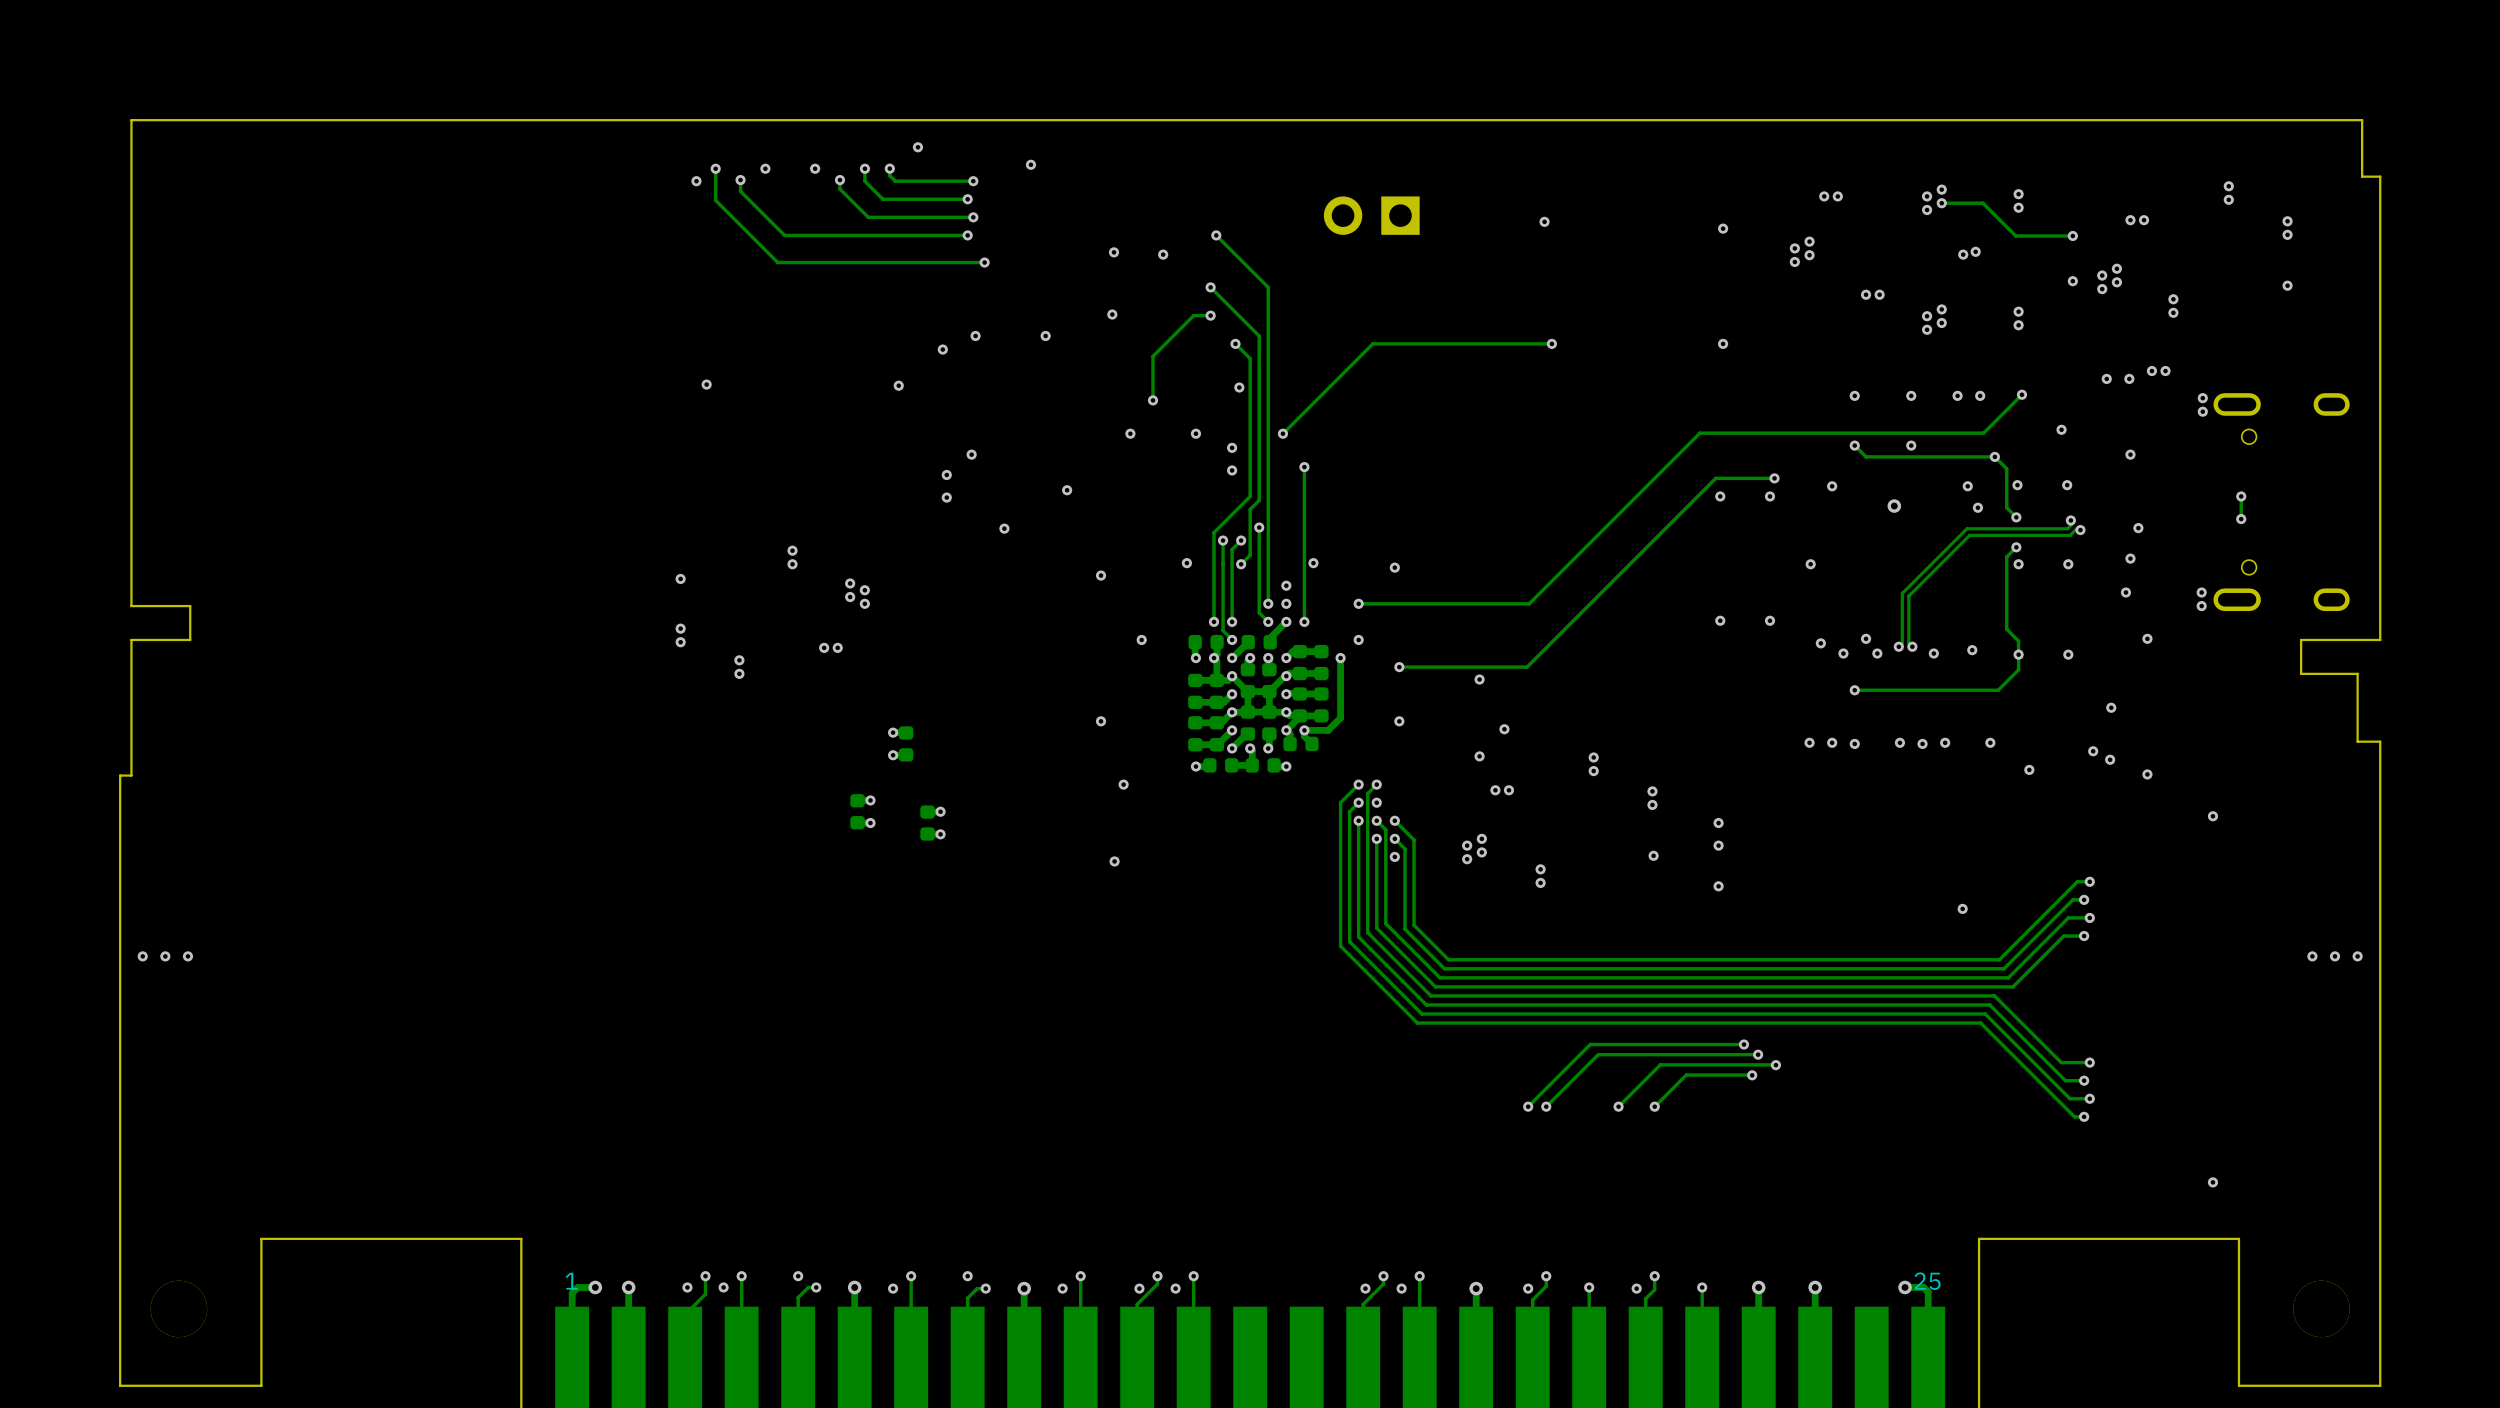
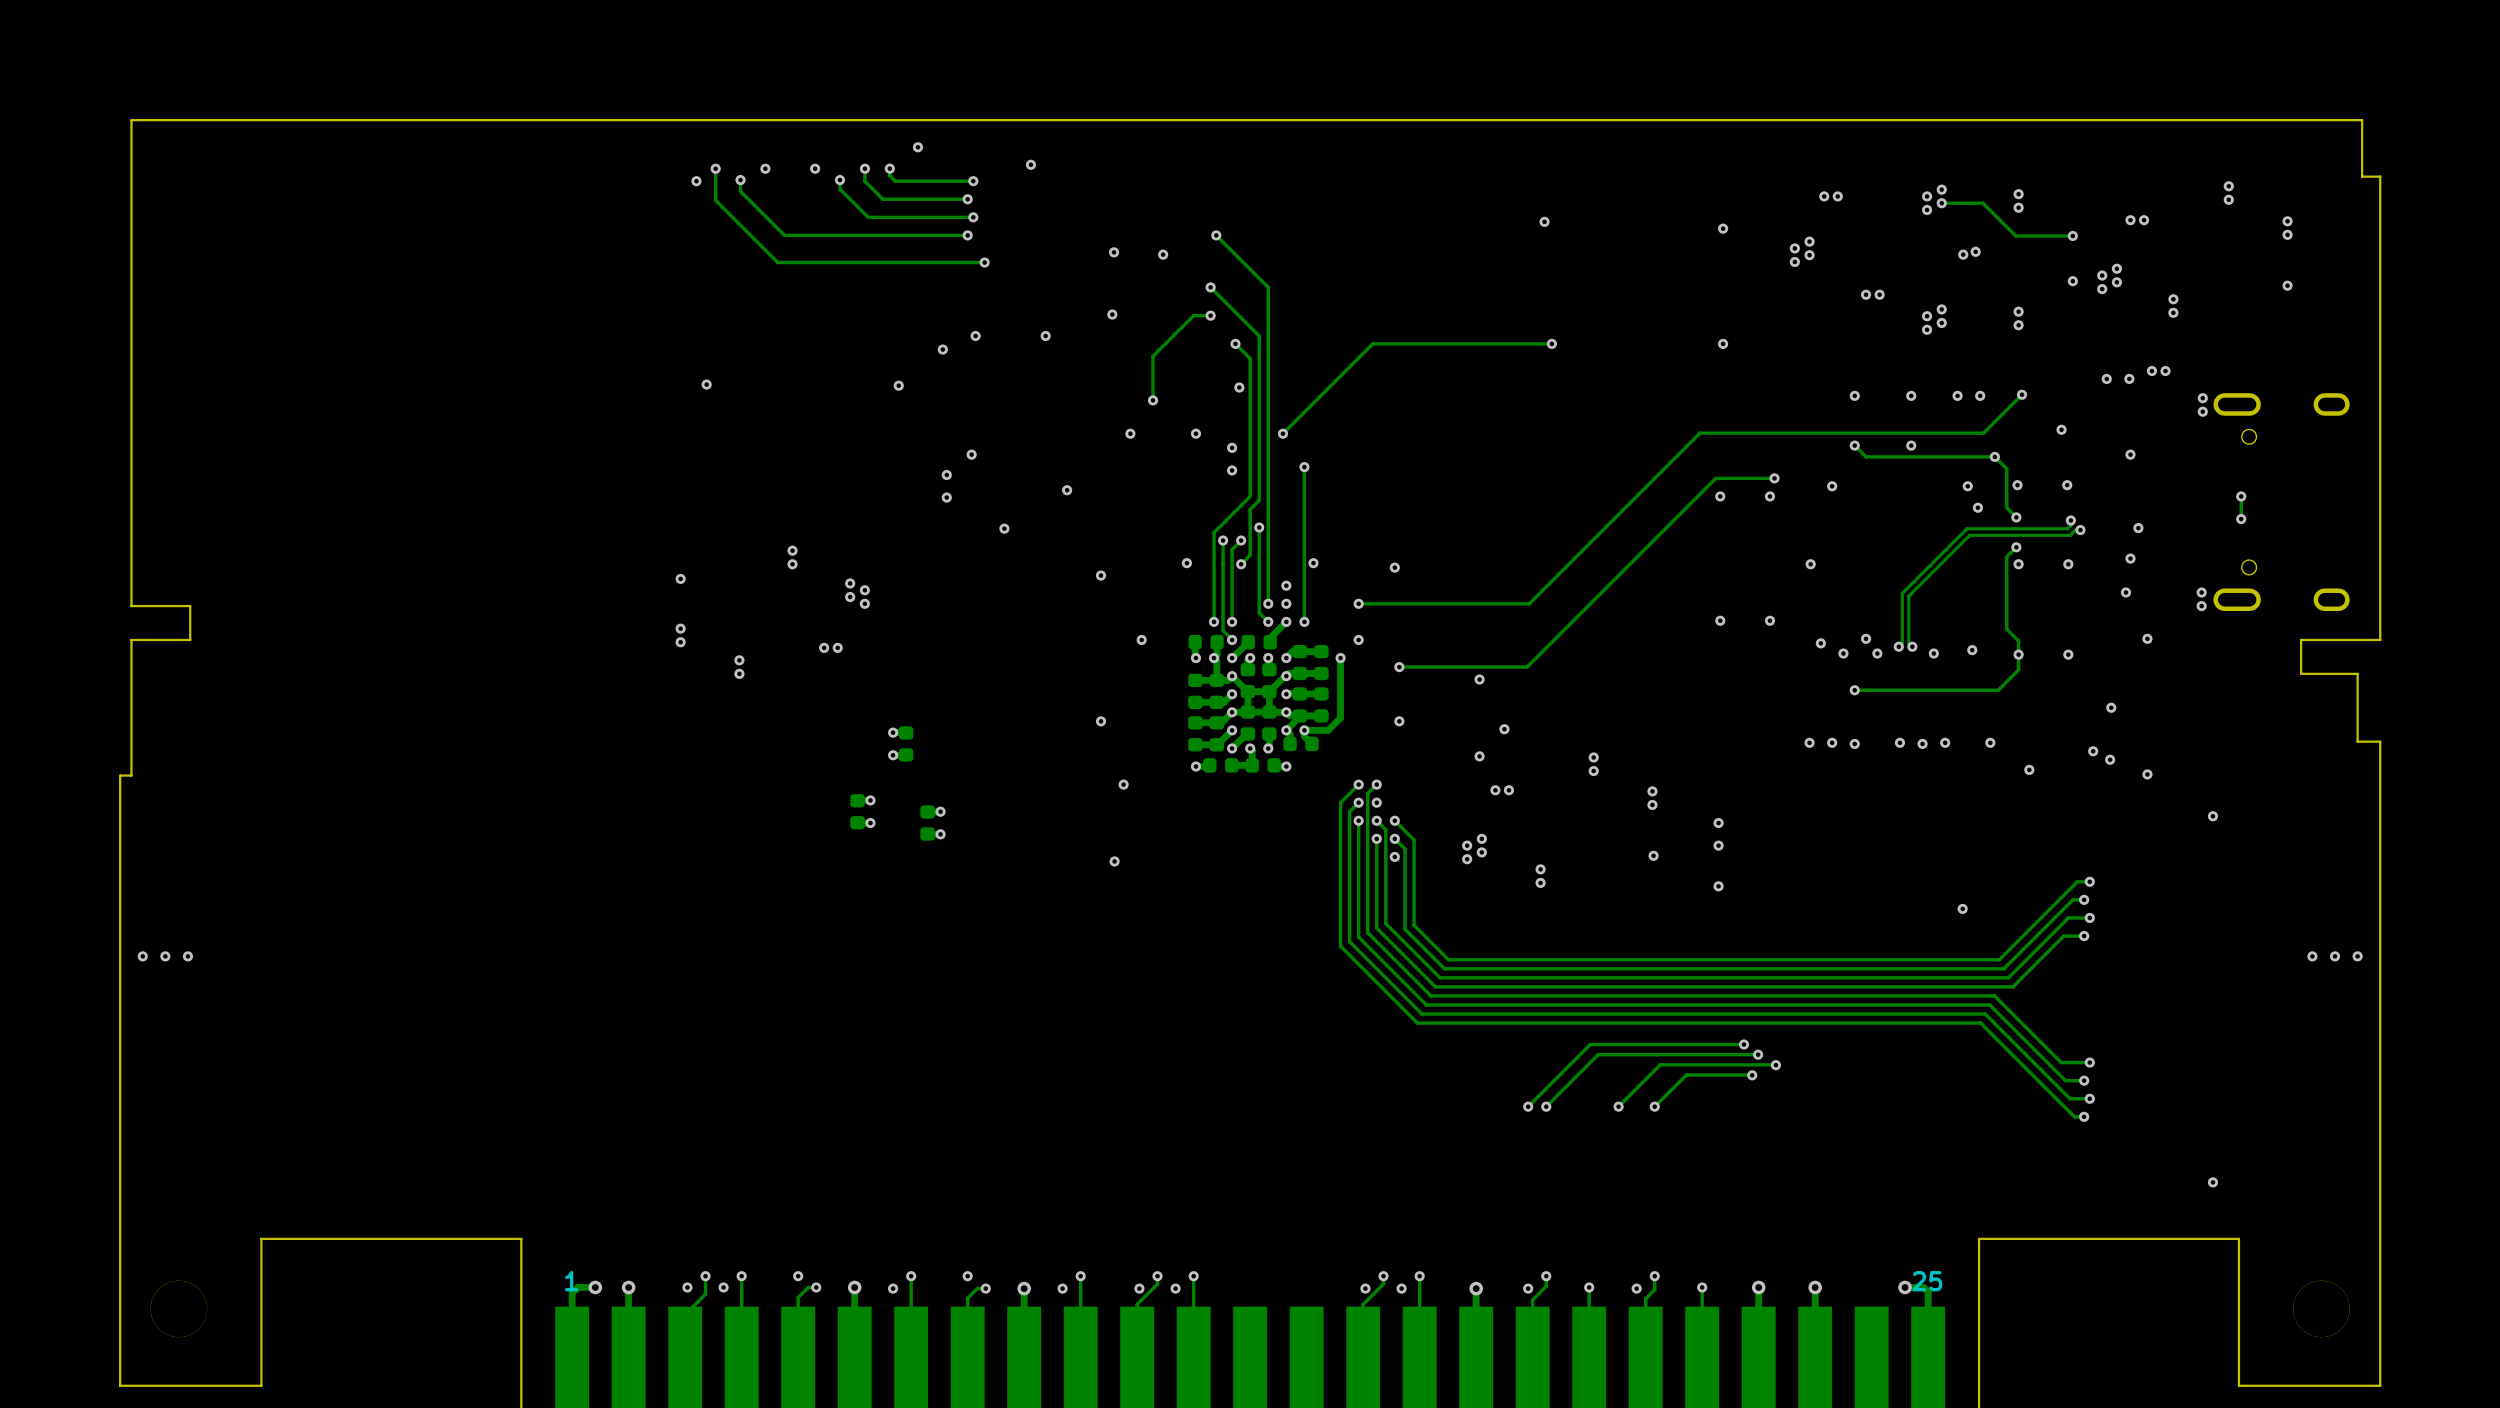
part: (1371, 215) -> none
via: (1894, 506) -> none

